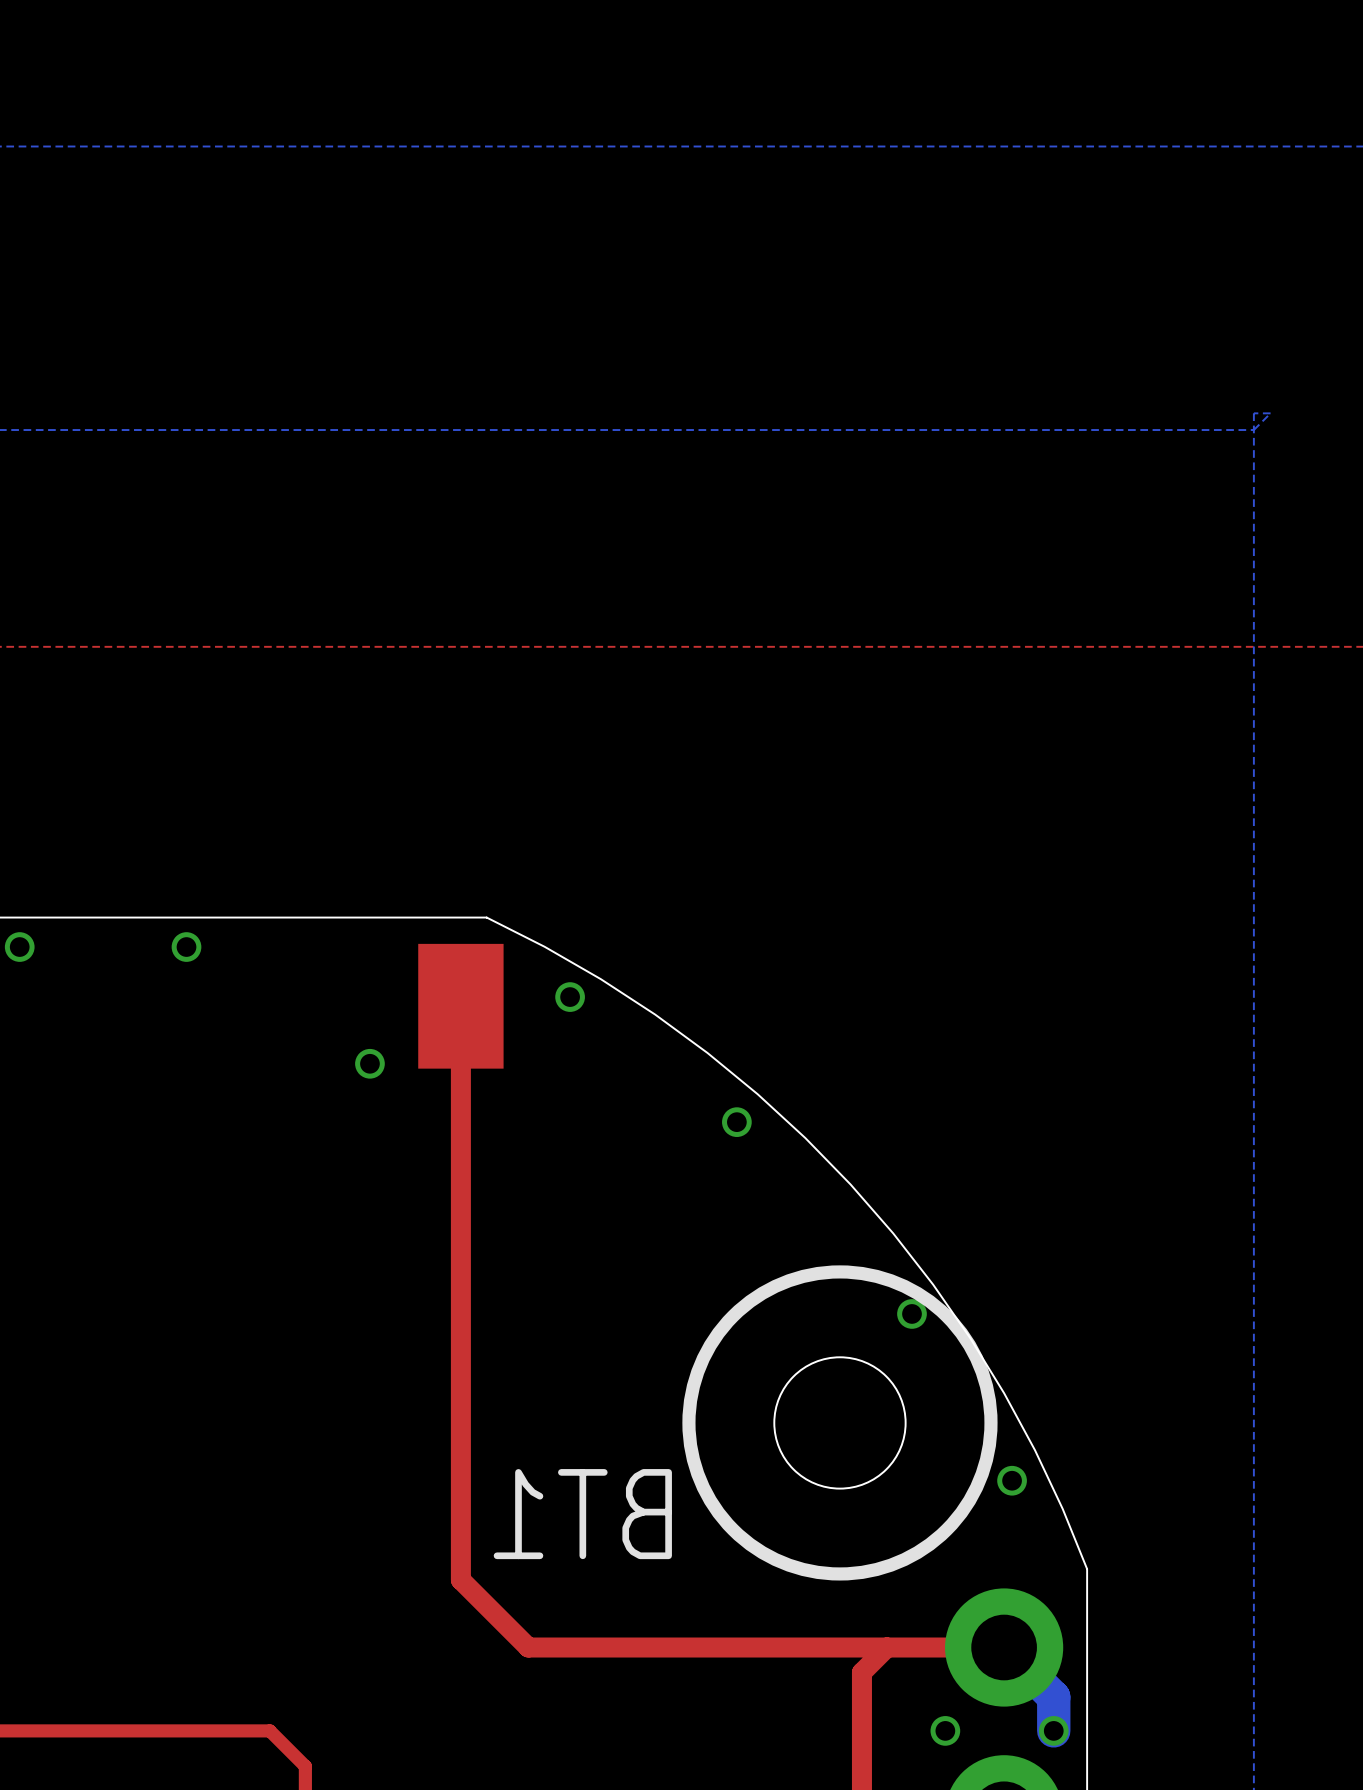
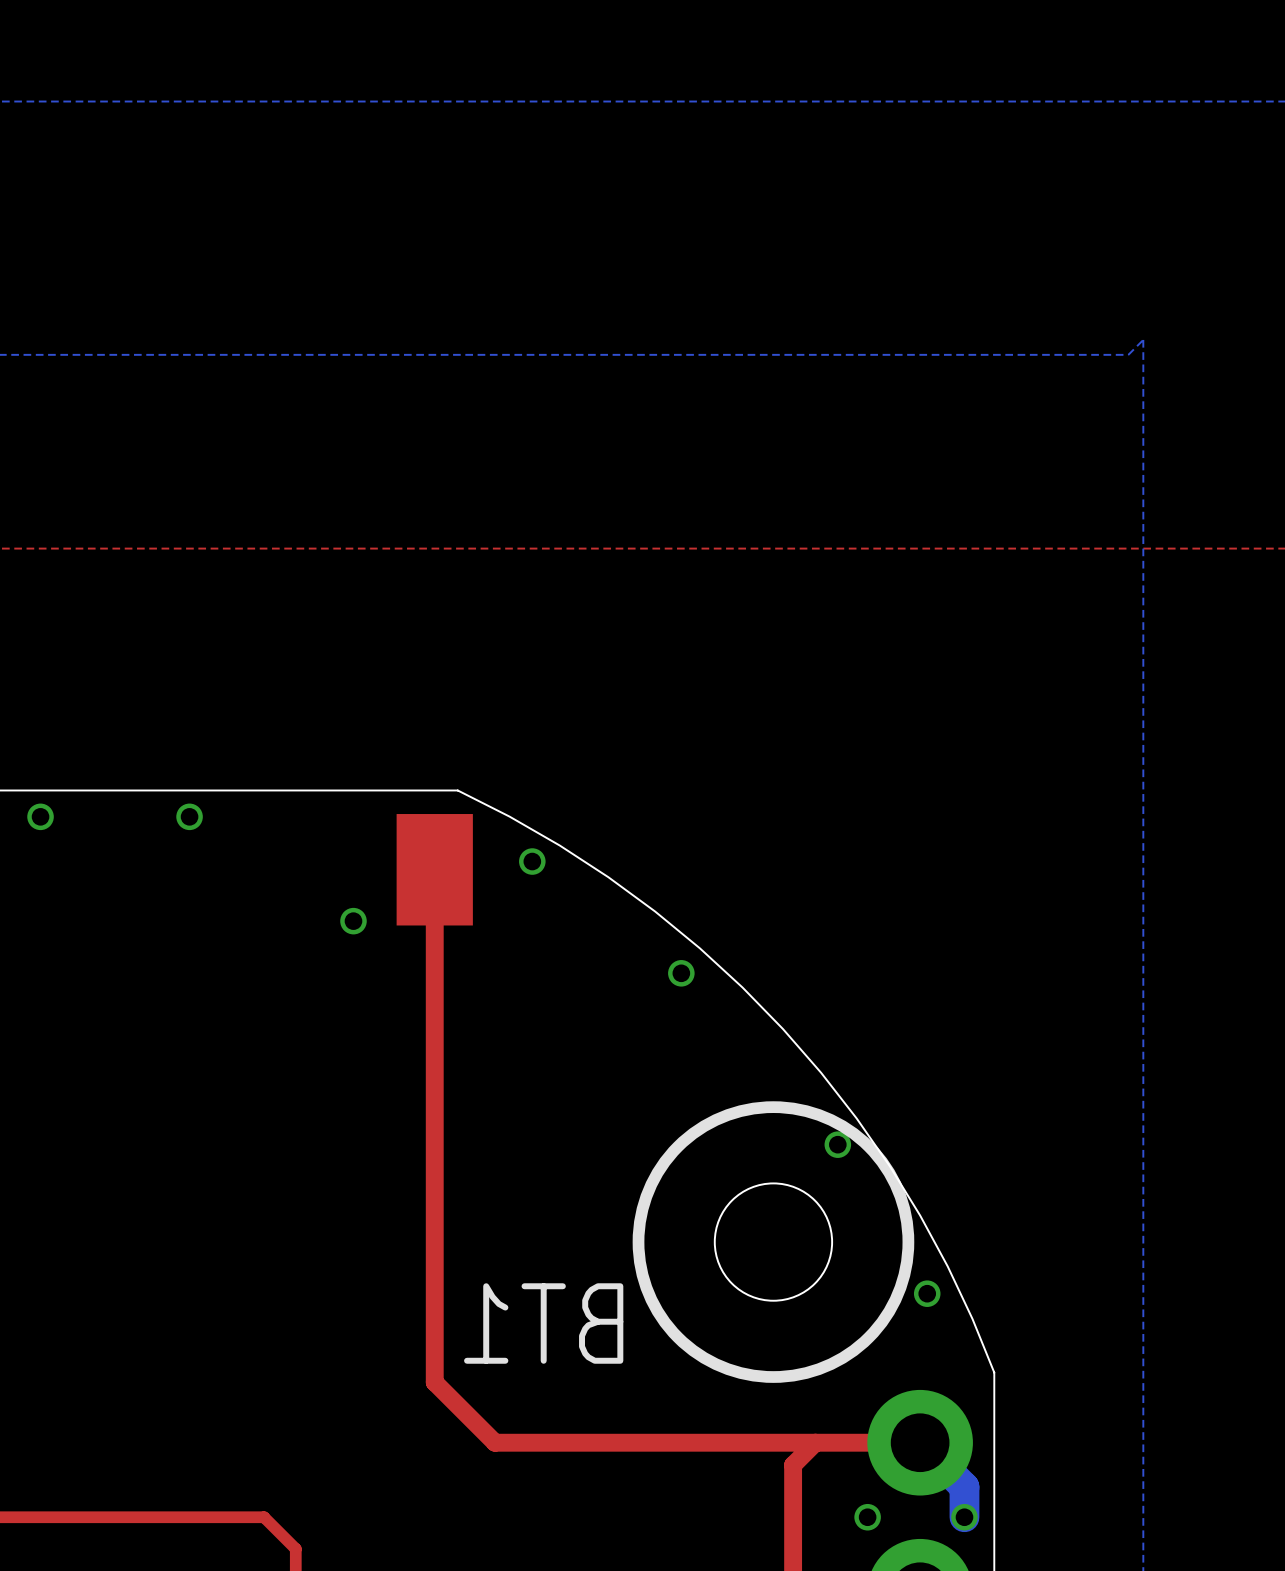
bottom zone outline: (1253, 413) (1270, 413) (1253, 430) (1237, 430) -> (1143, 339) (1128, 354)

